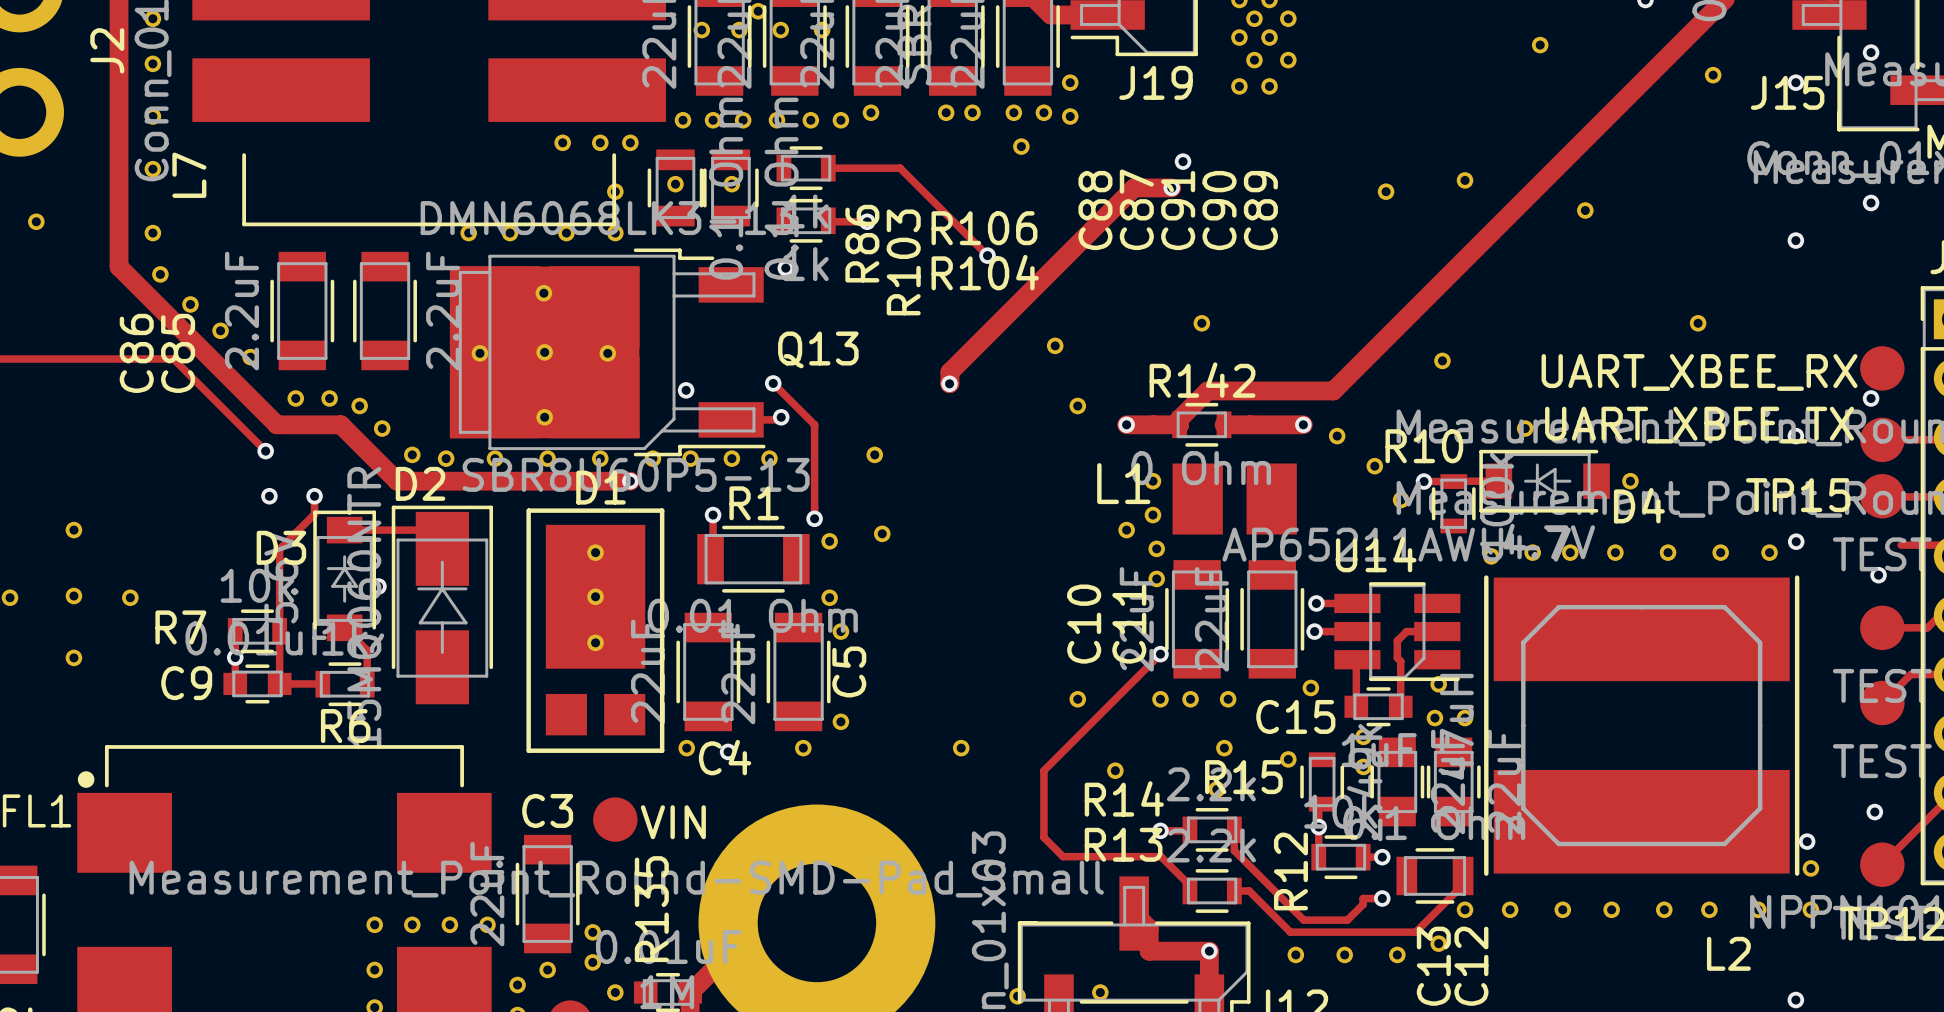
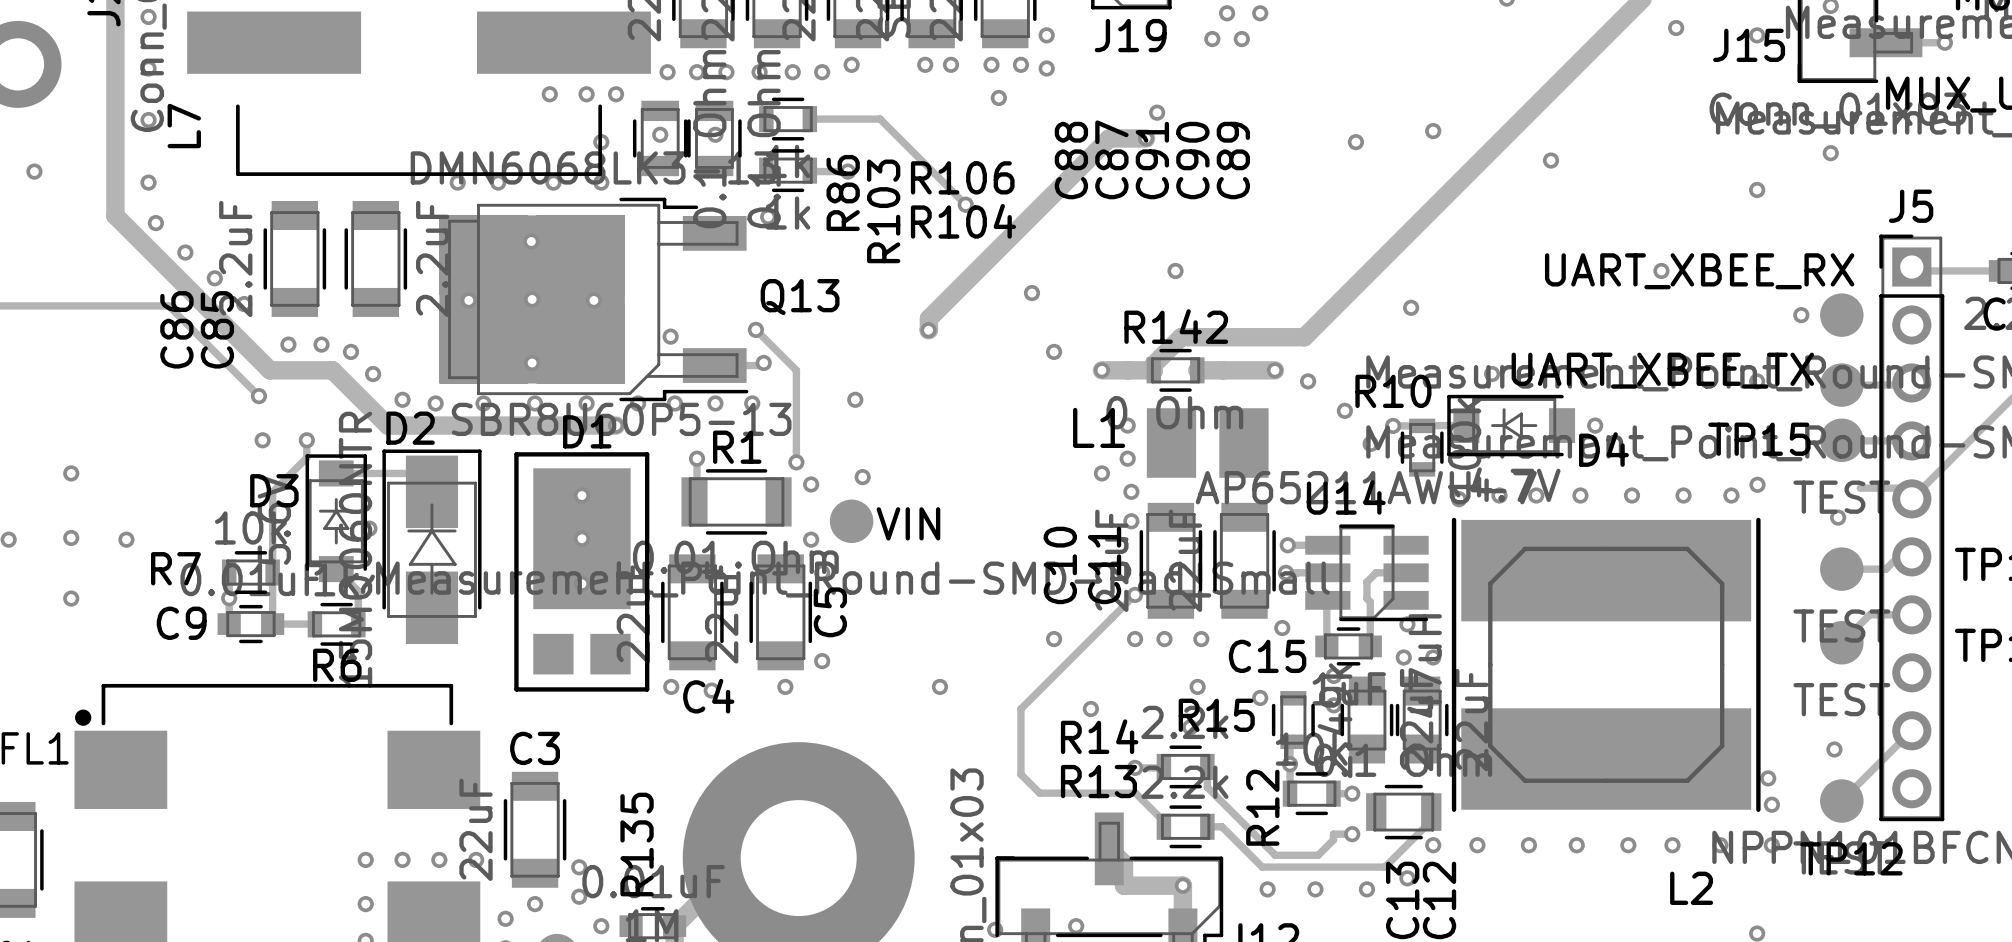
C86 name position: C86 (136, 353) -> C86 (176, 329)
C85 name position: C85 (178, 353) -> C85 (217, 329)
UART_XBEE_RX name position: UART_XBEE_RX (1699, 372) -> UART_XBEE_RX (1699, 271)
via position: (1871, 398) -> (1801, 315)
VIN position: (615, 819) -> (851, 521)

